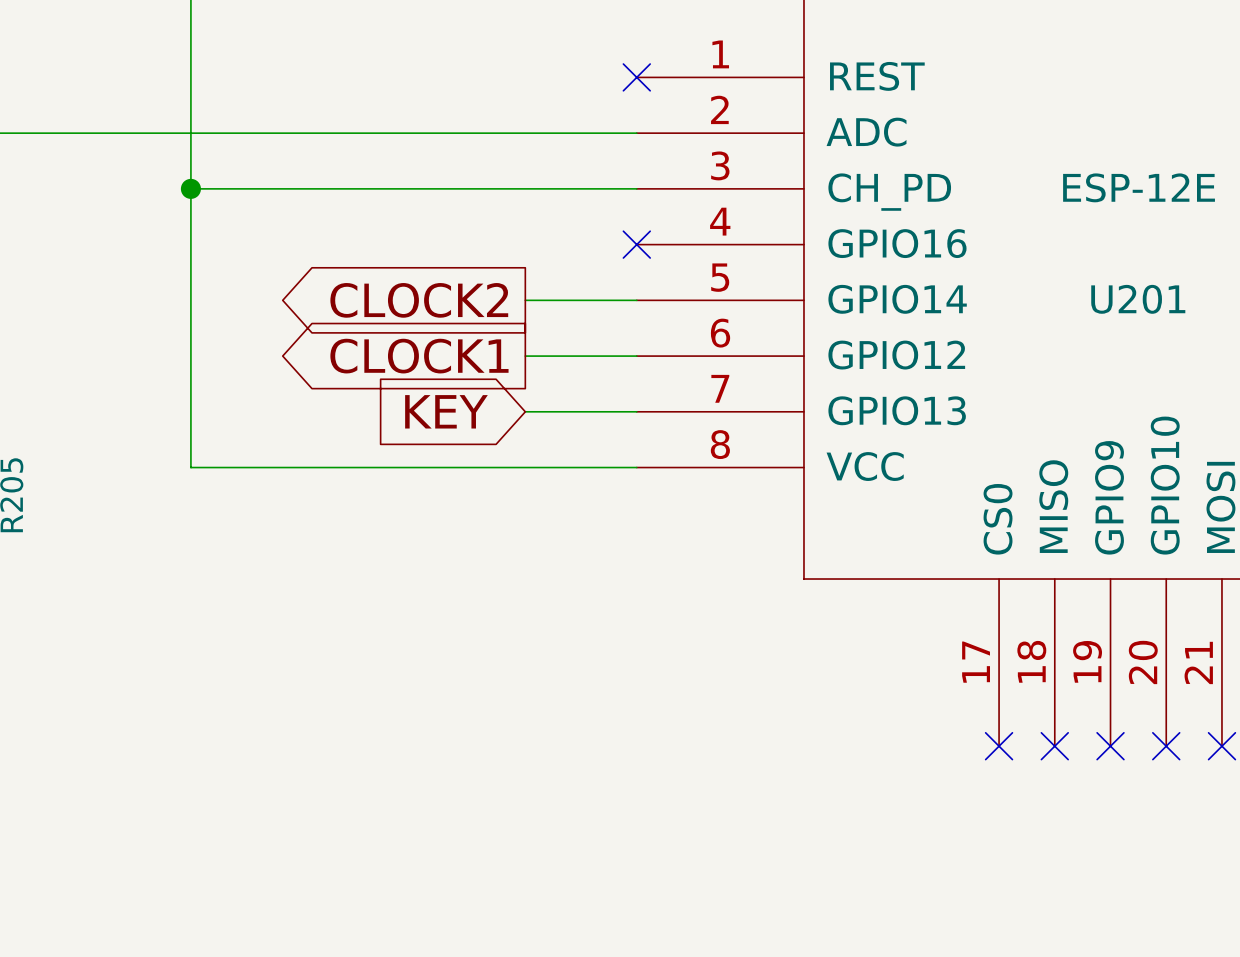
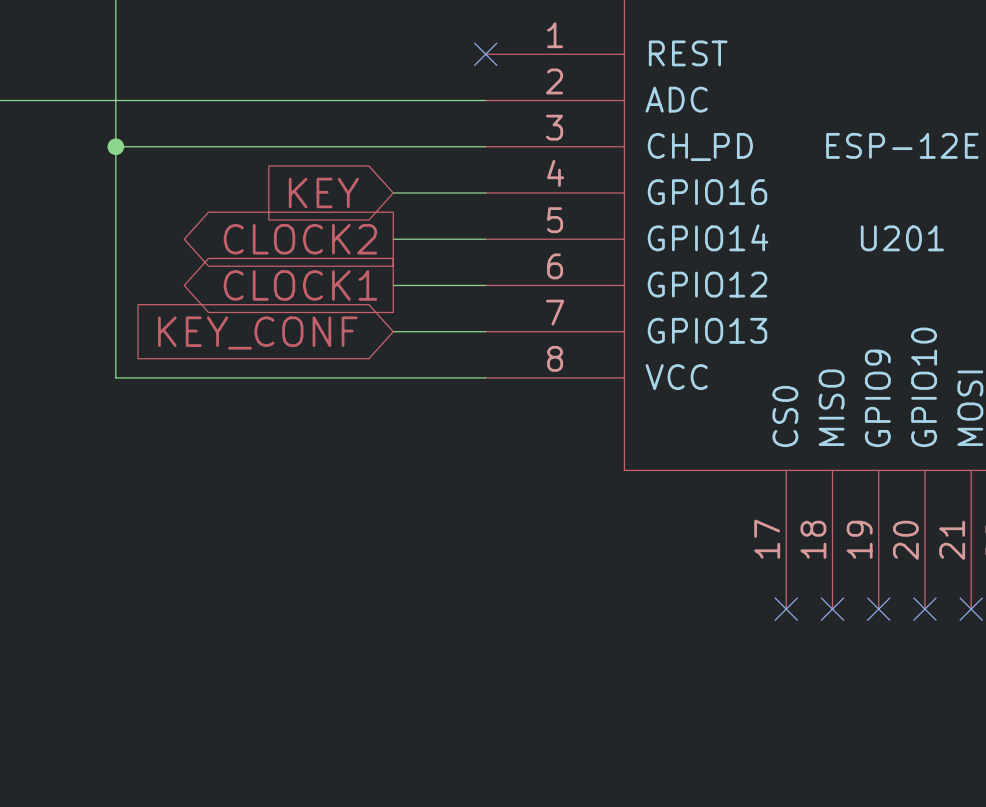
global label: none -> KEY (323, 192)
wire: none -> (393, 192) (485, 192)
no-connect mark: (636, 244) -> none
global label: KEY (446, 411) -> KEY_CONF (257, 333)

